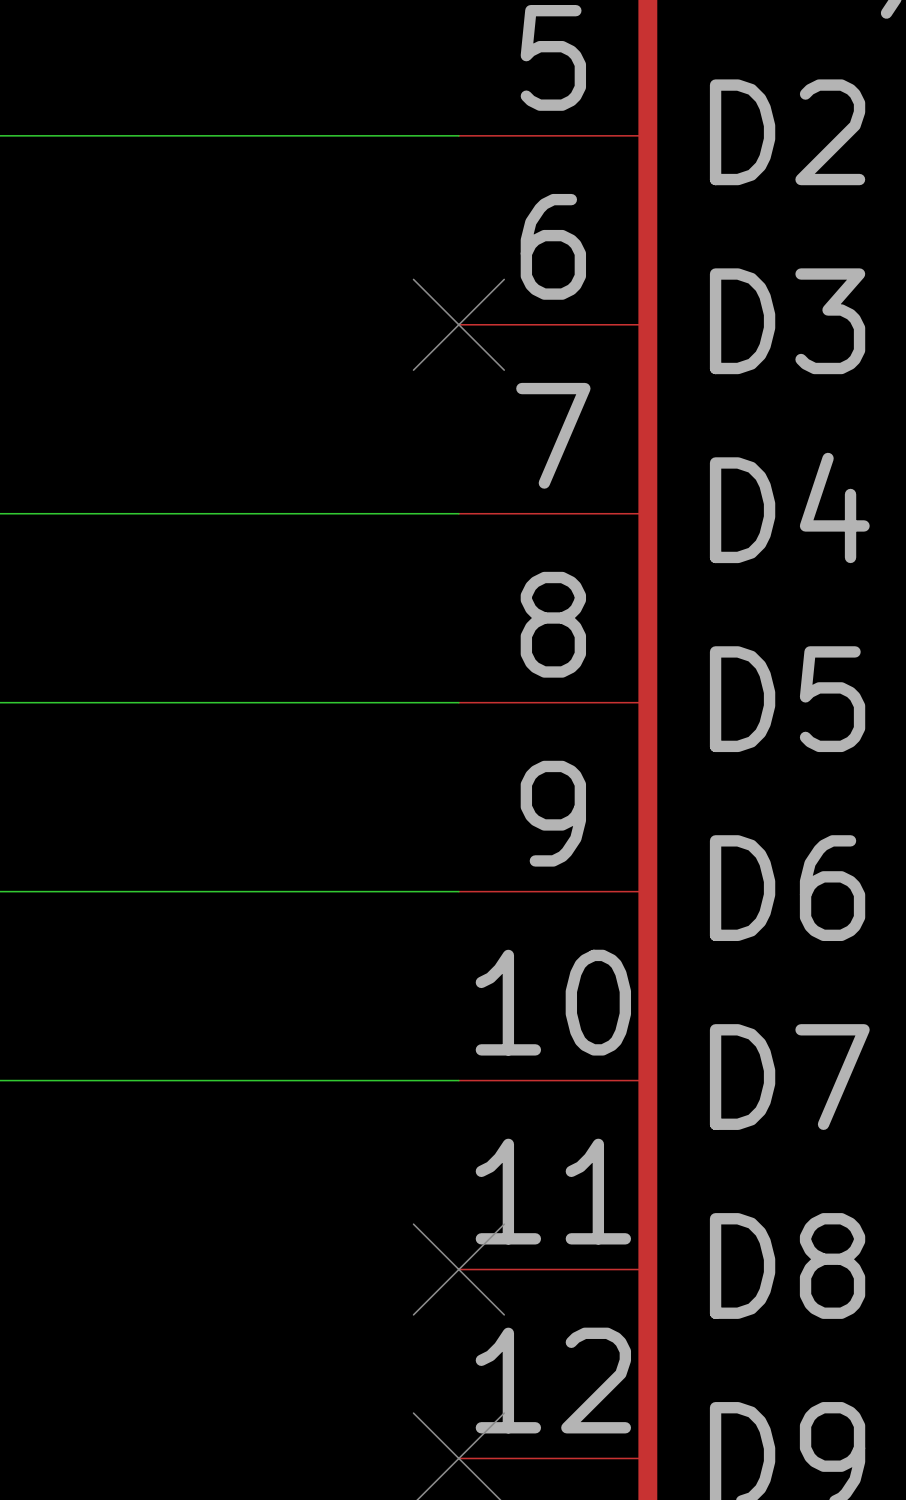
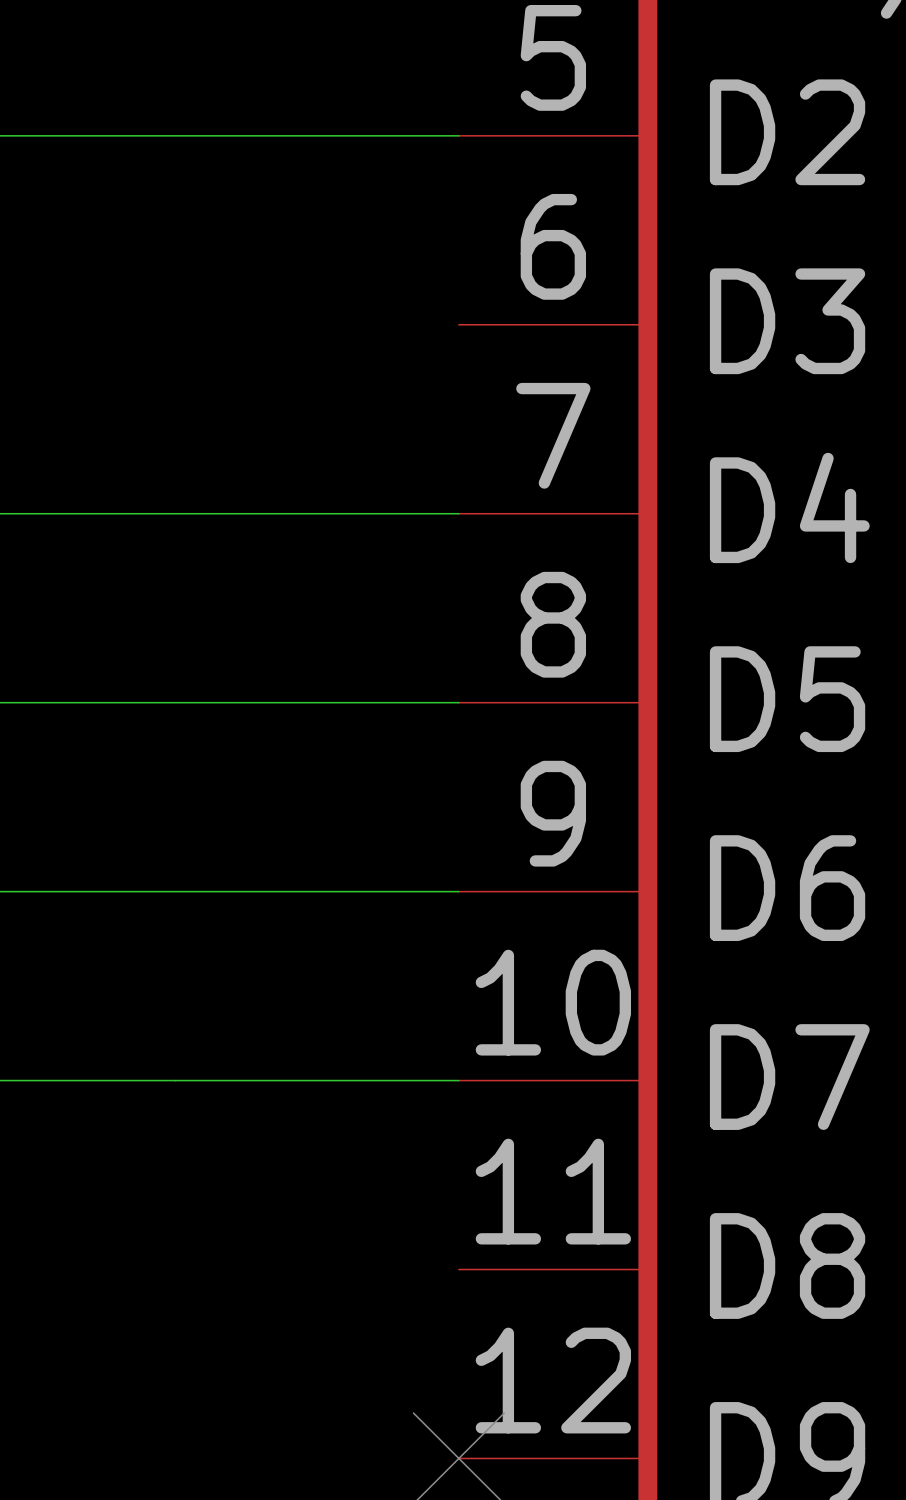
no-connect mark: (458, 324) -> none
no-connect mark: (458, 1269) -> none

